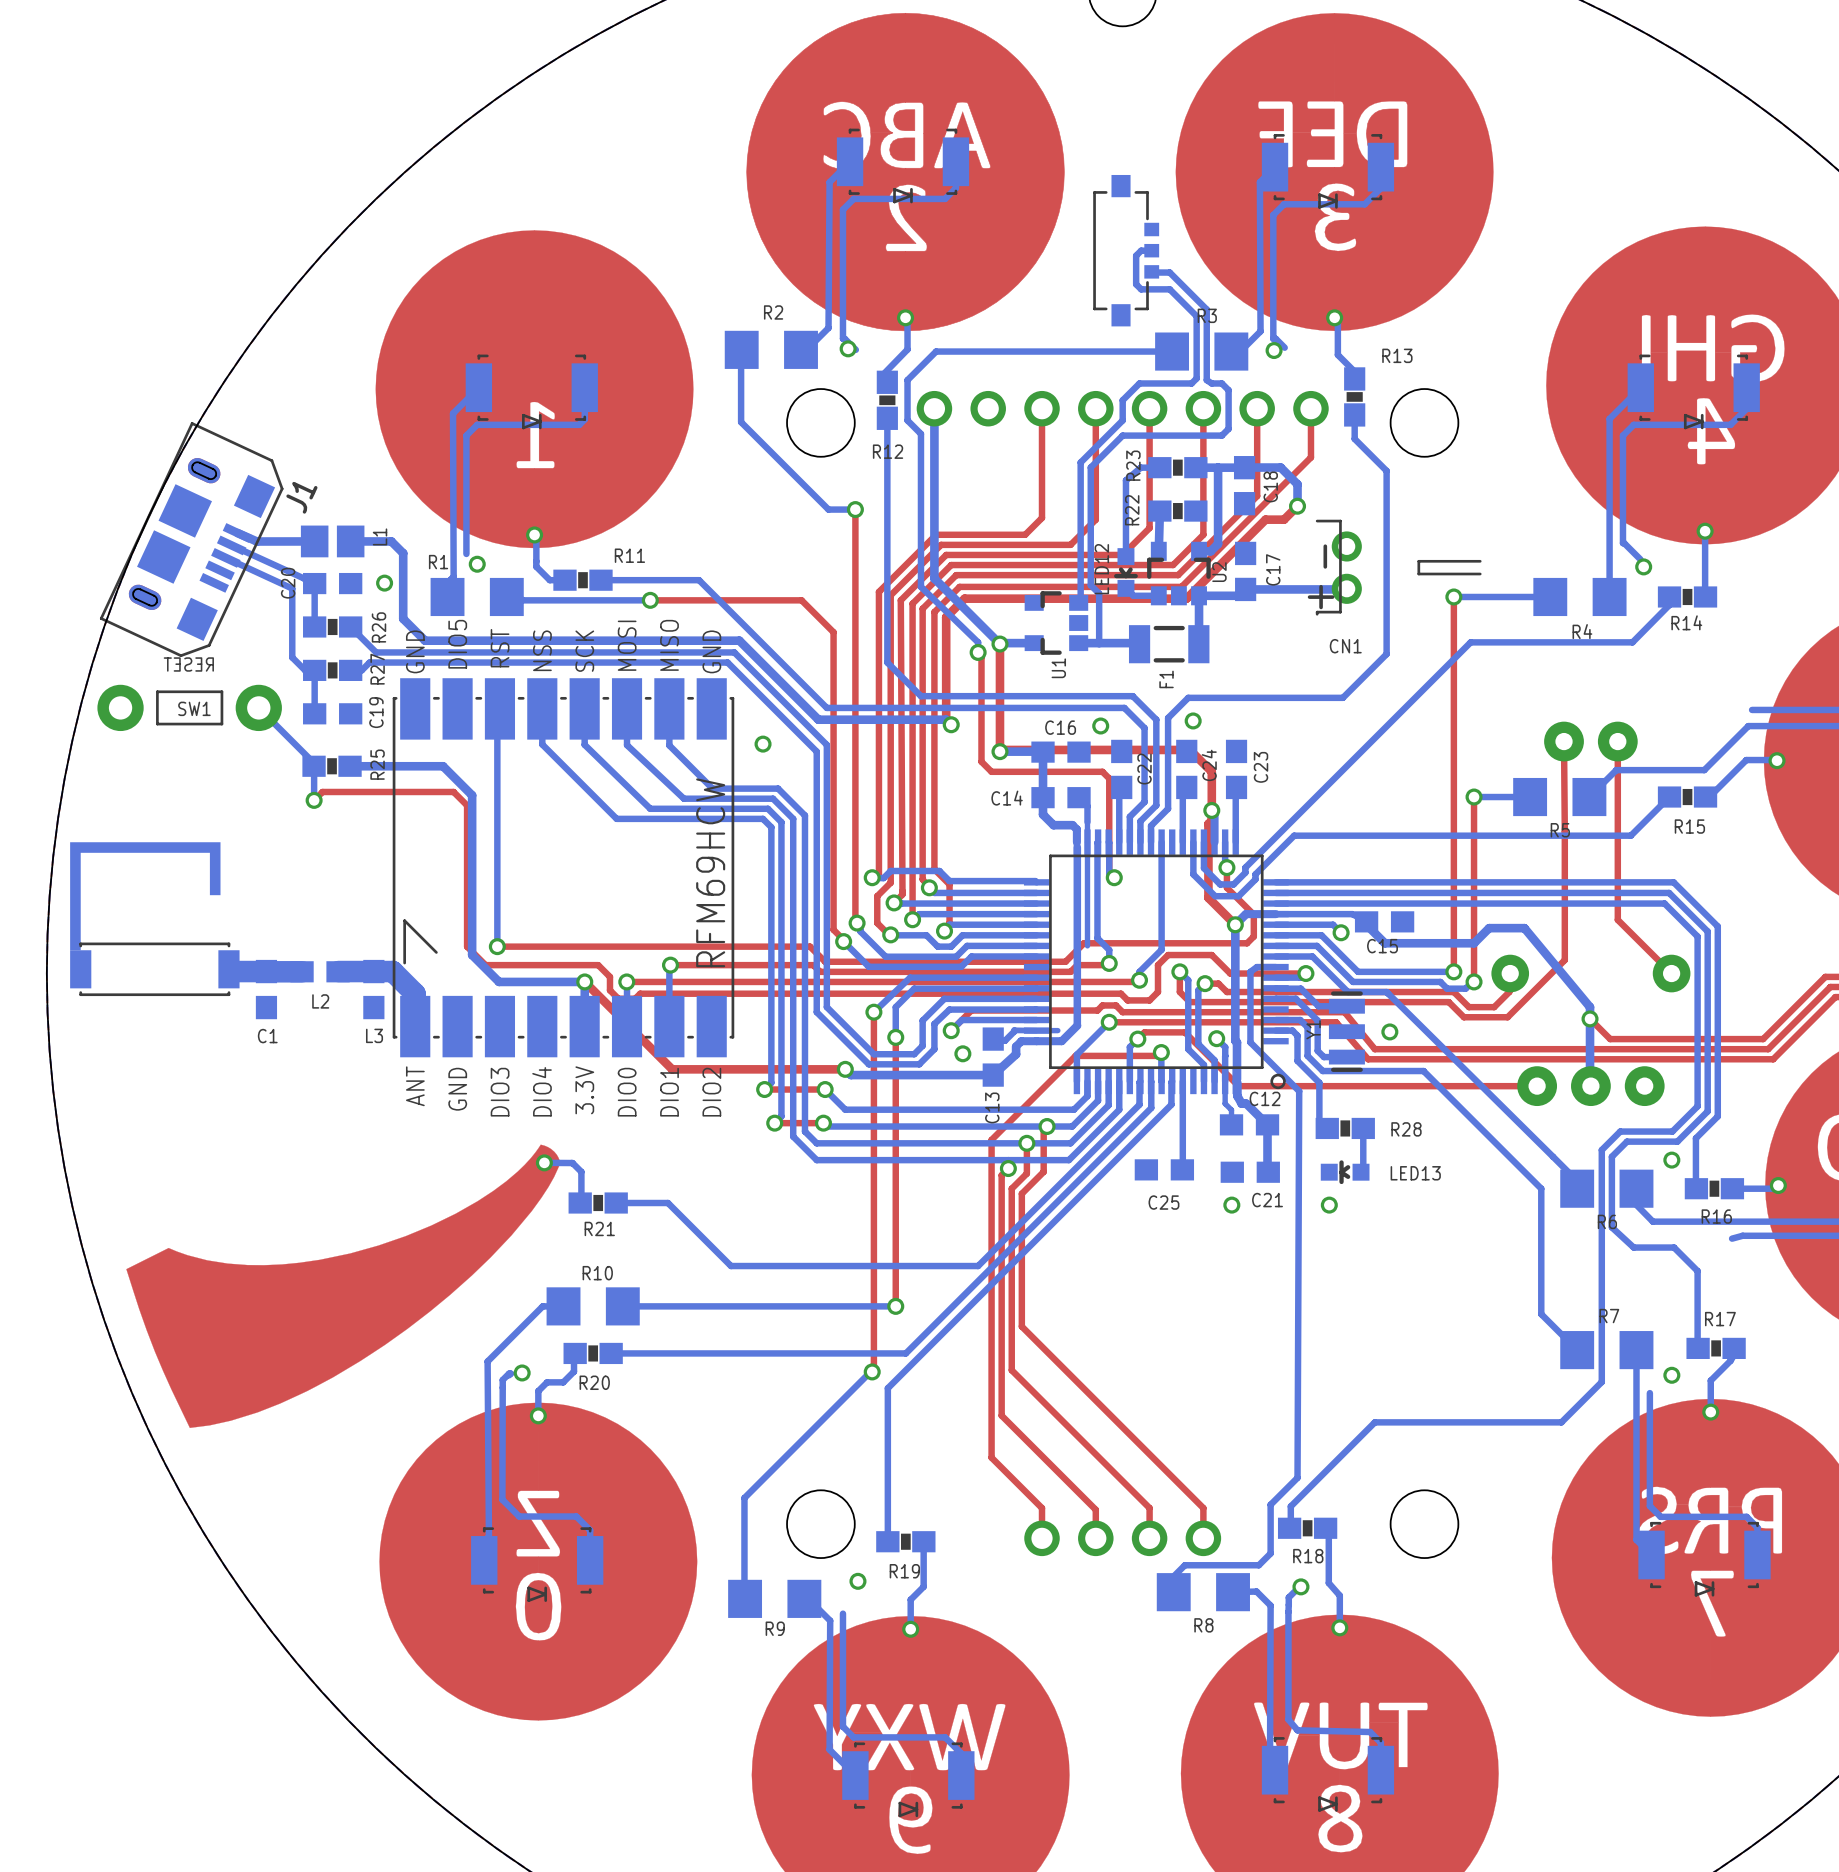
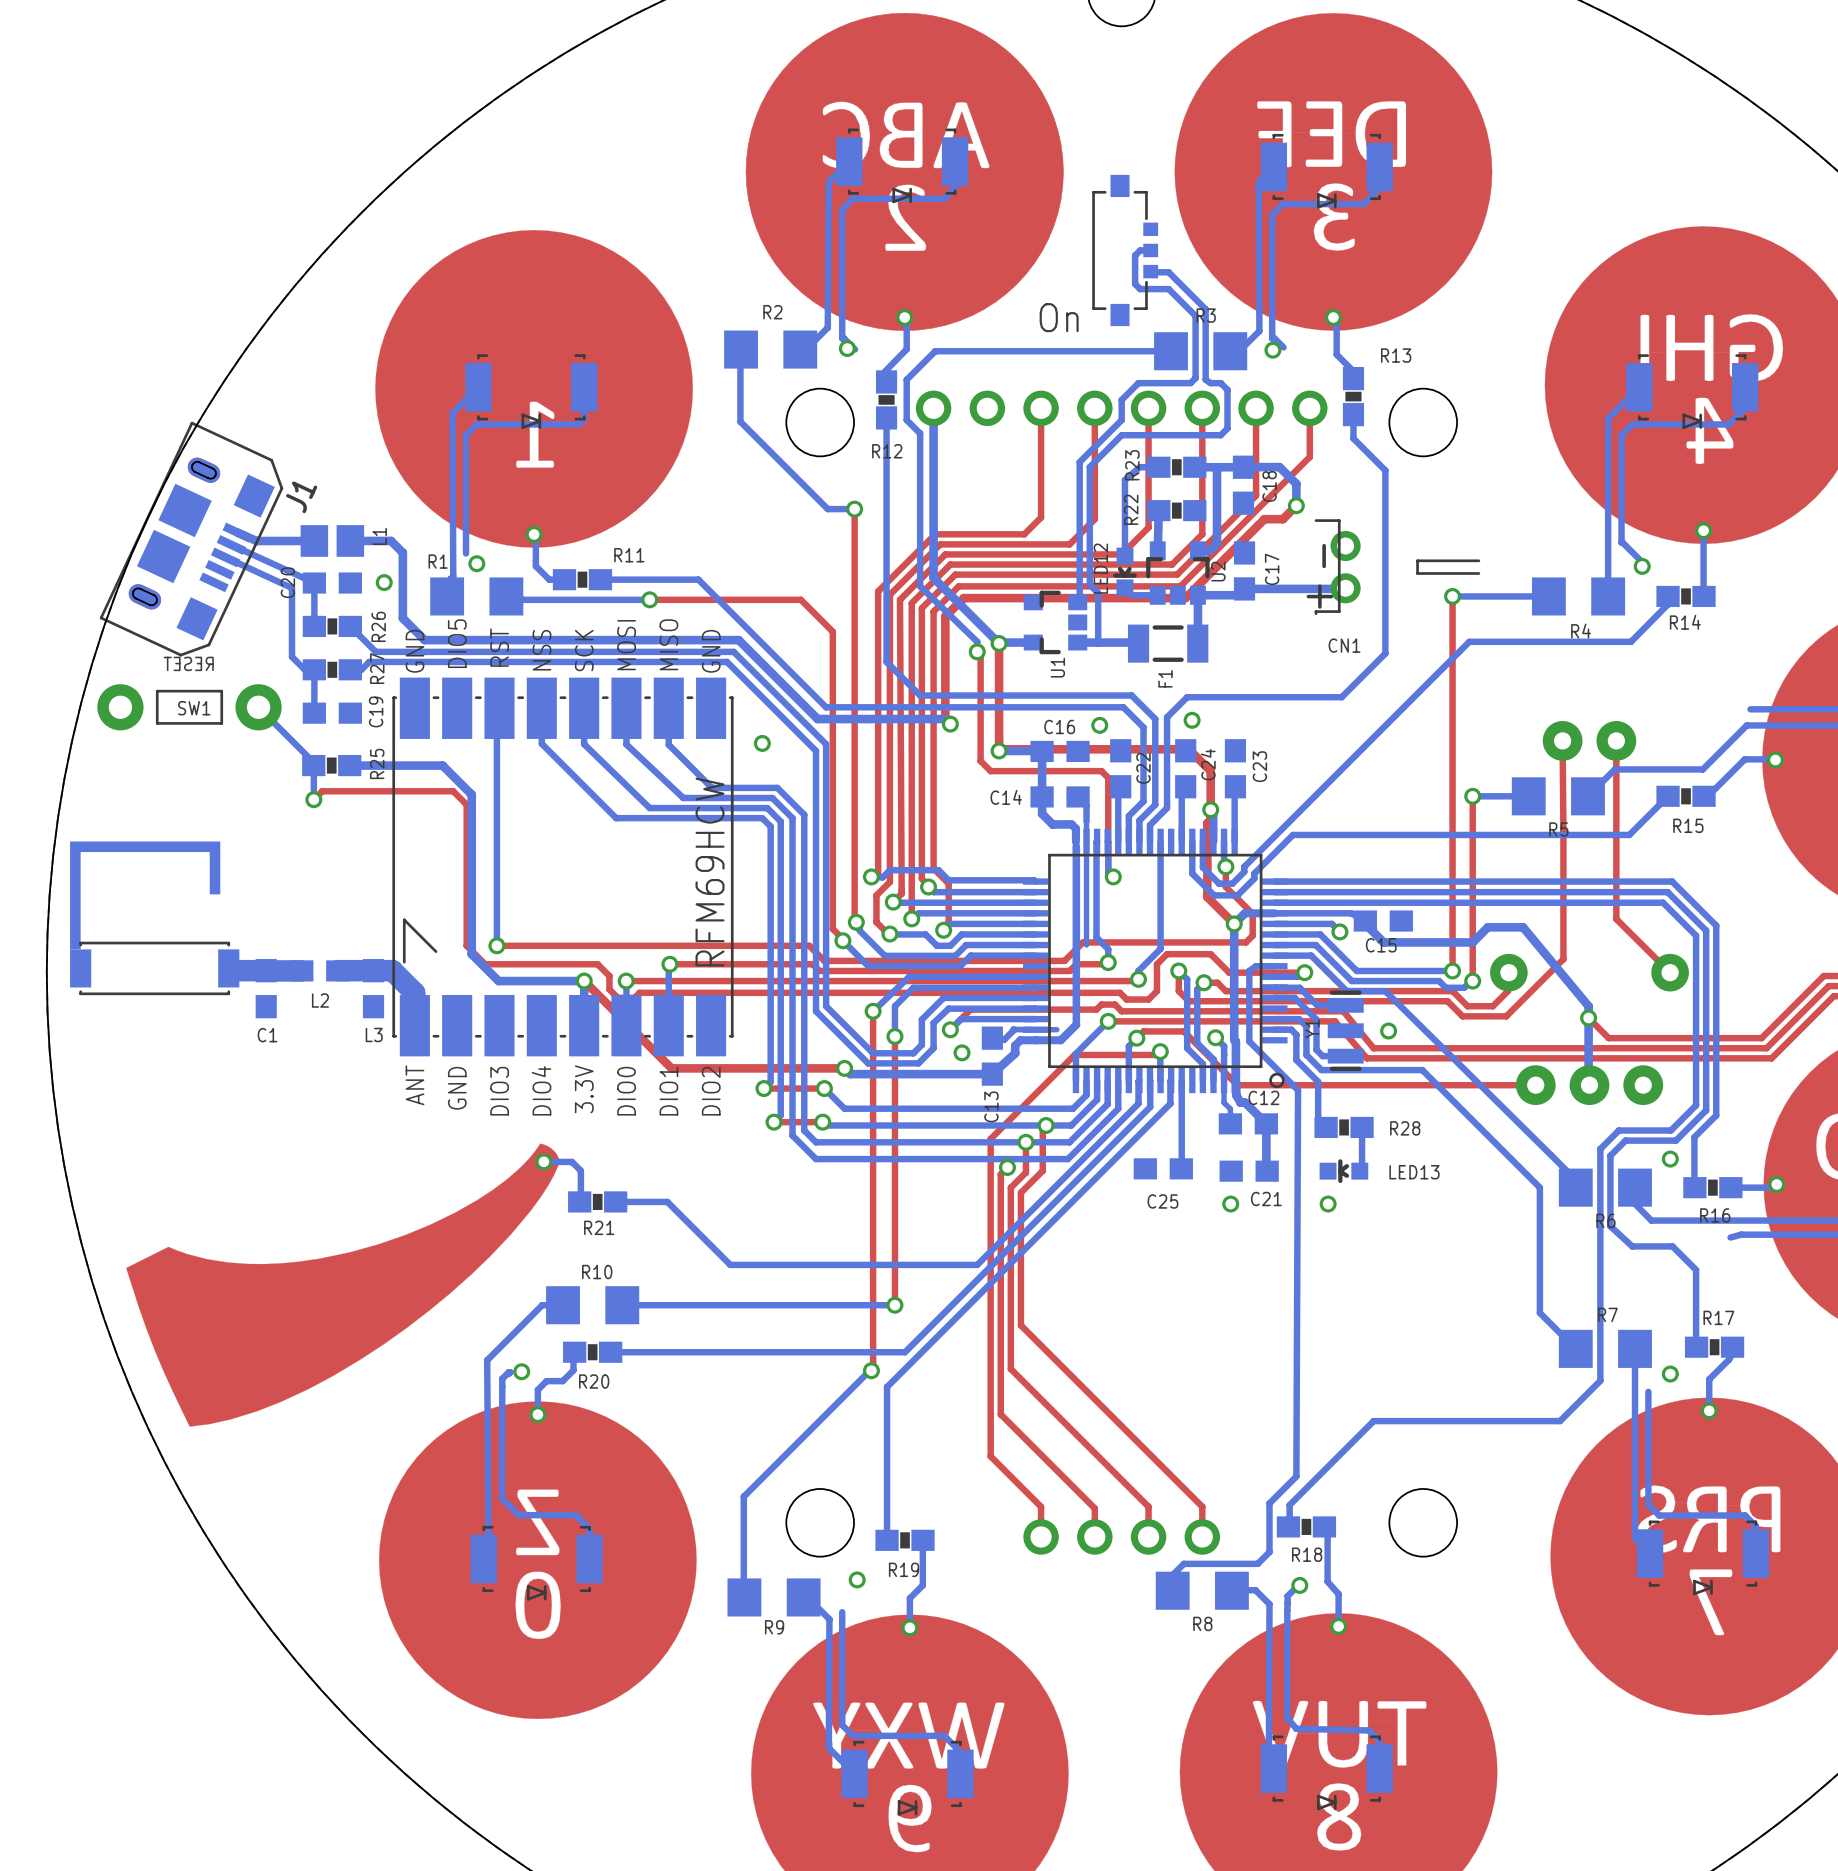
text: none -> On (1059, 317)

